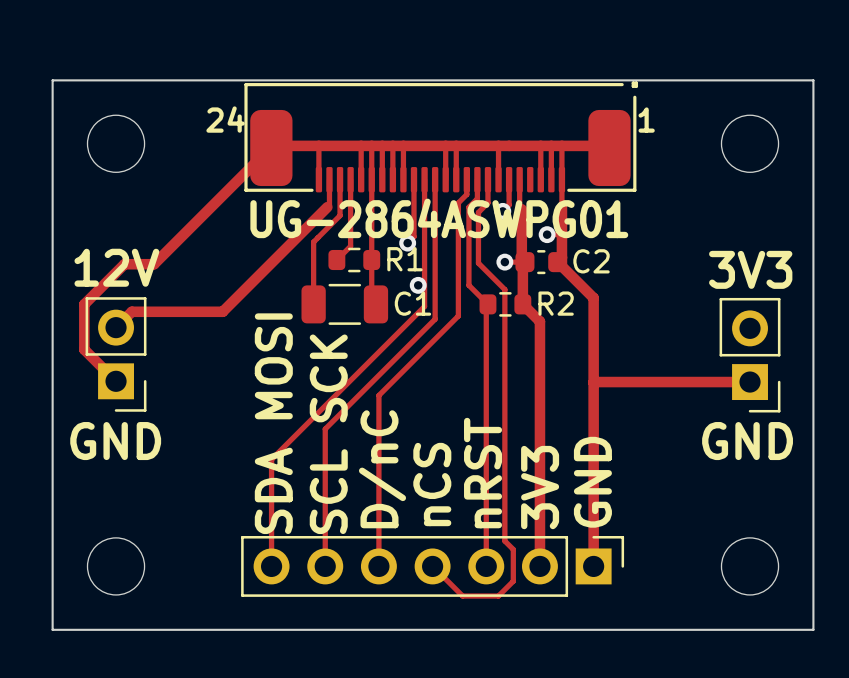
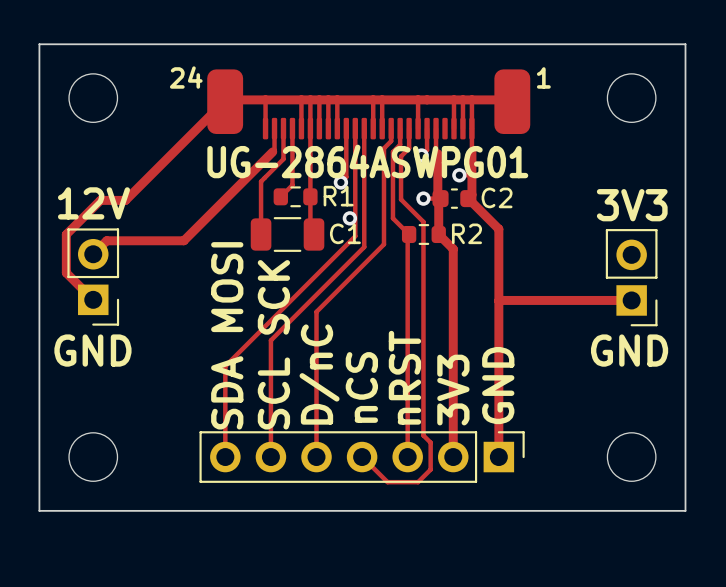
part footprint: [244, 81, 639, 193] -> [207, 69, 531, 140]

